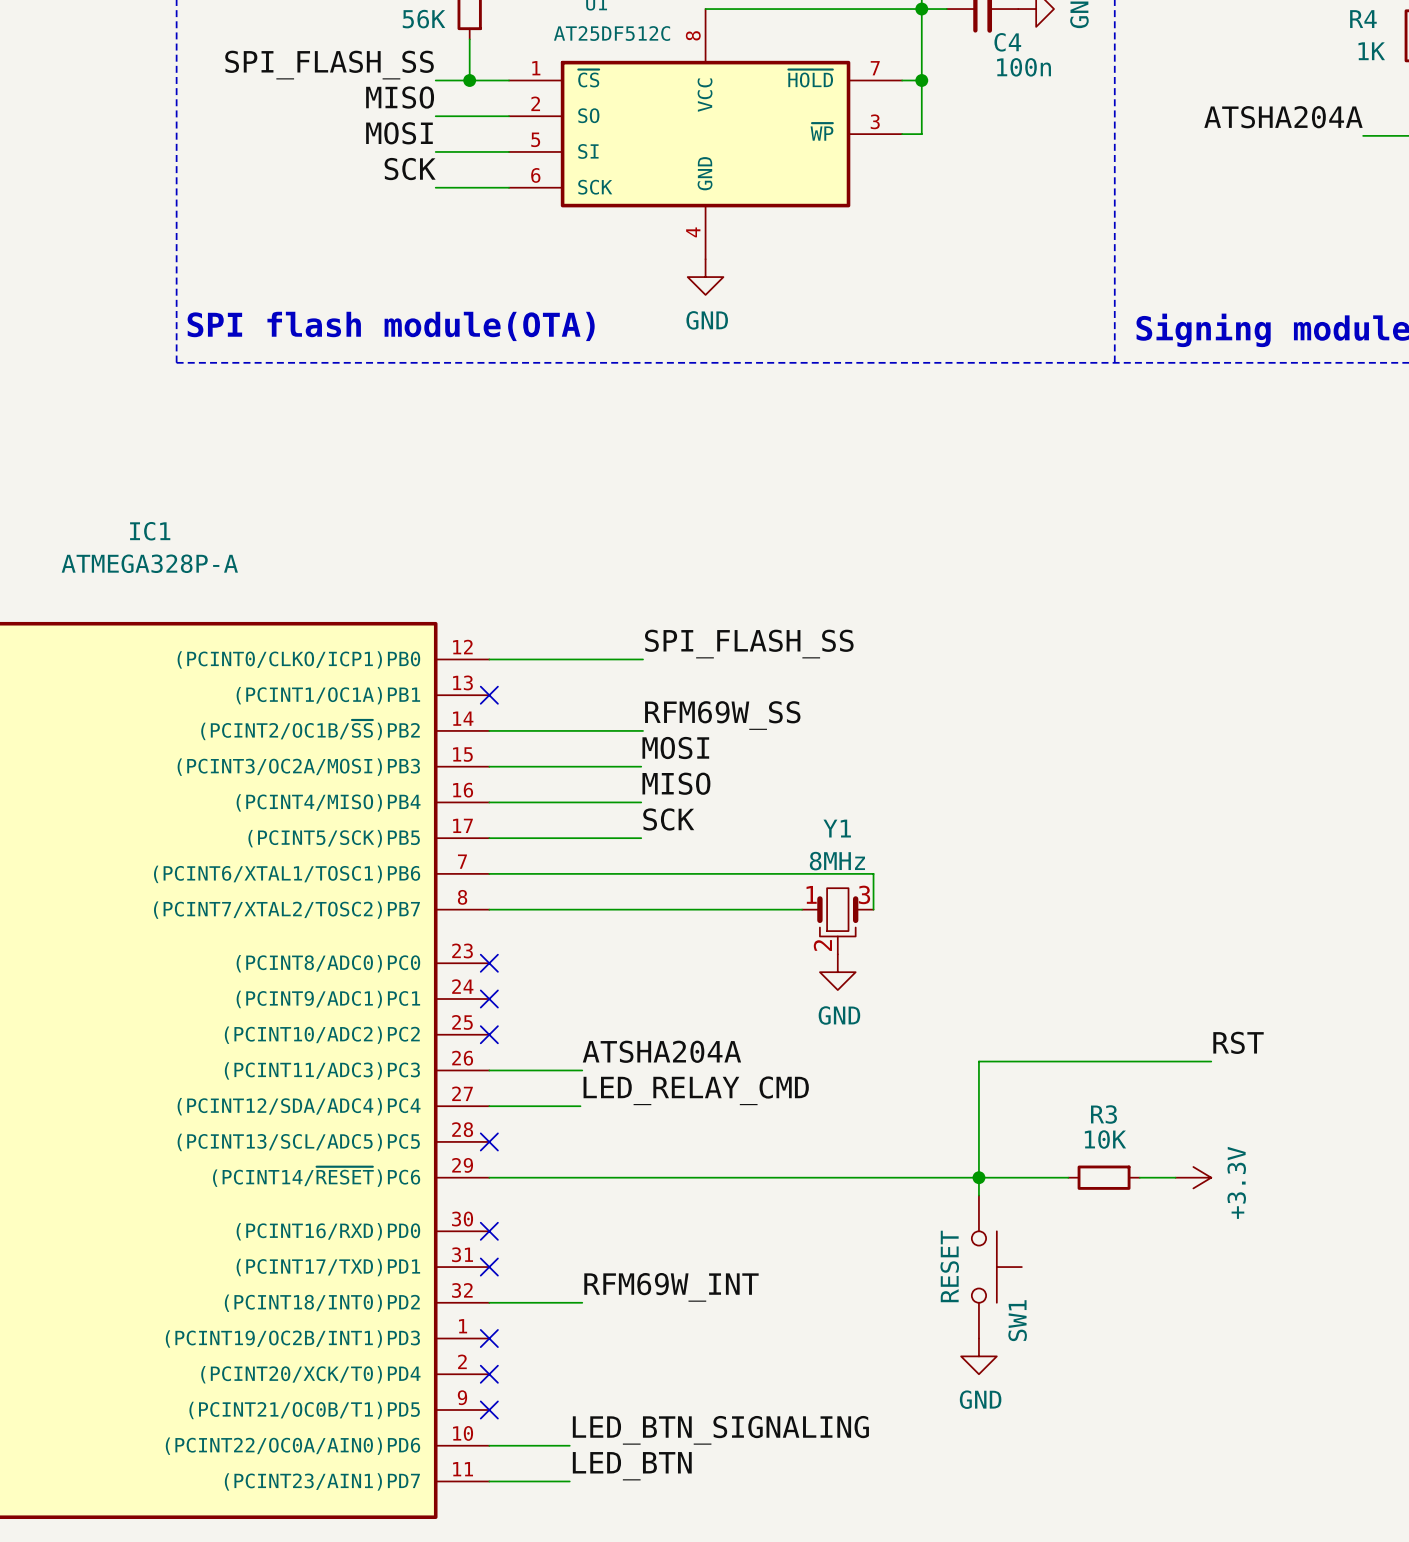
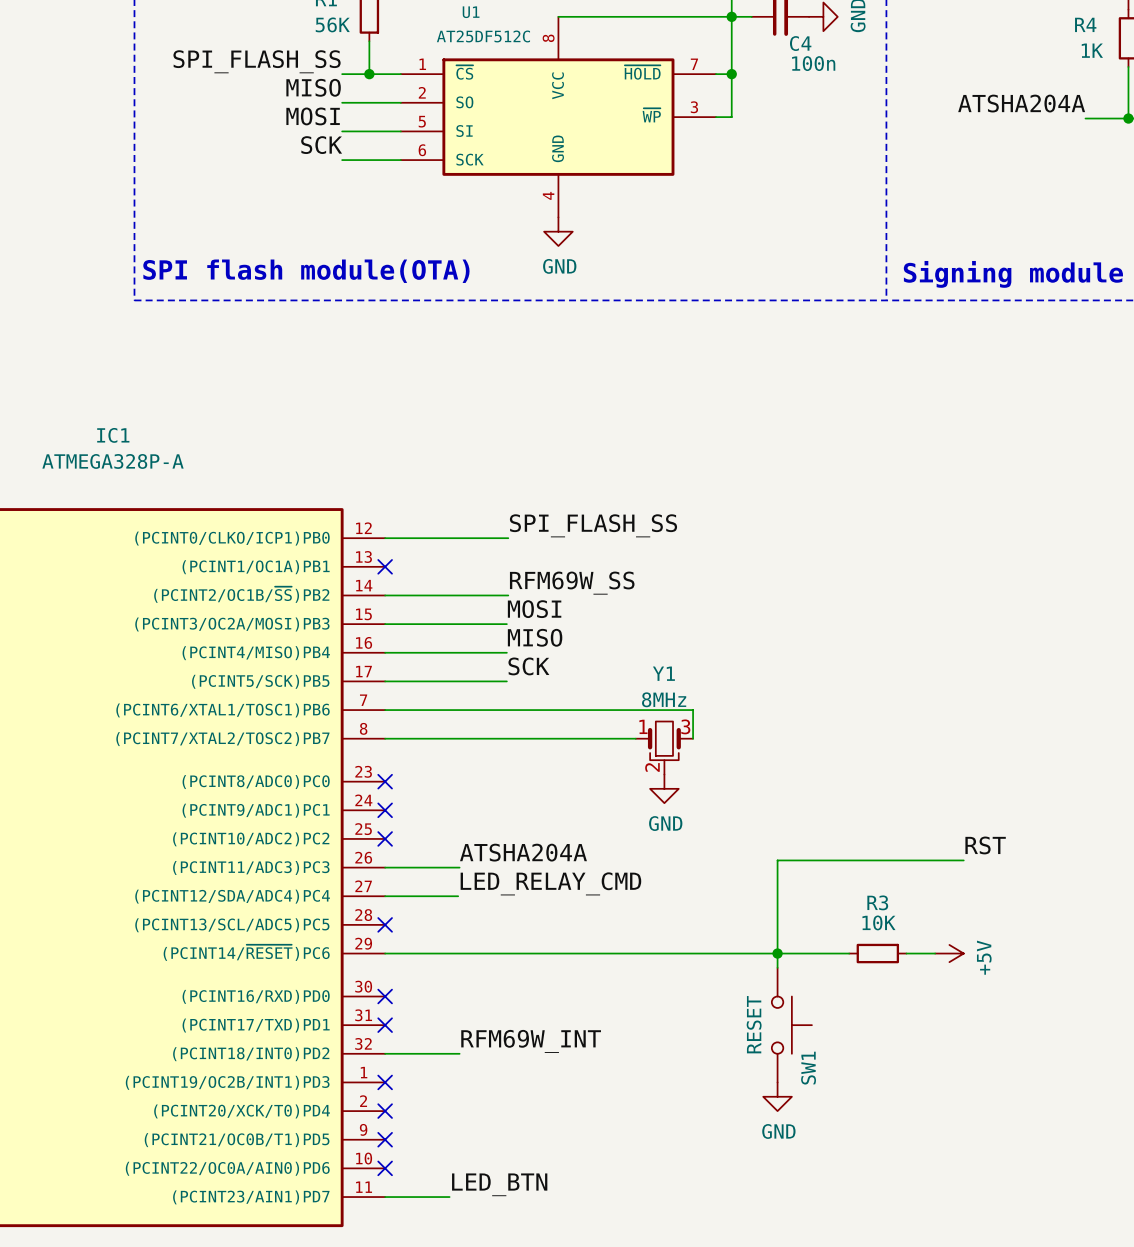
power symbol: +3.3V (1193, 1177) -> +5V (949, 953)
label: LED_BTN_SIGNALING (720, 1430) -> none
wire: (489, 1445) (569, 1445) -> none
no-connect mark: none -> (385, 1168)

